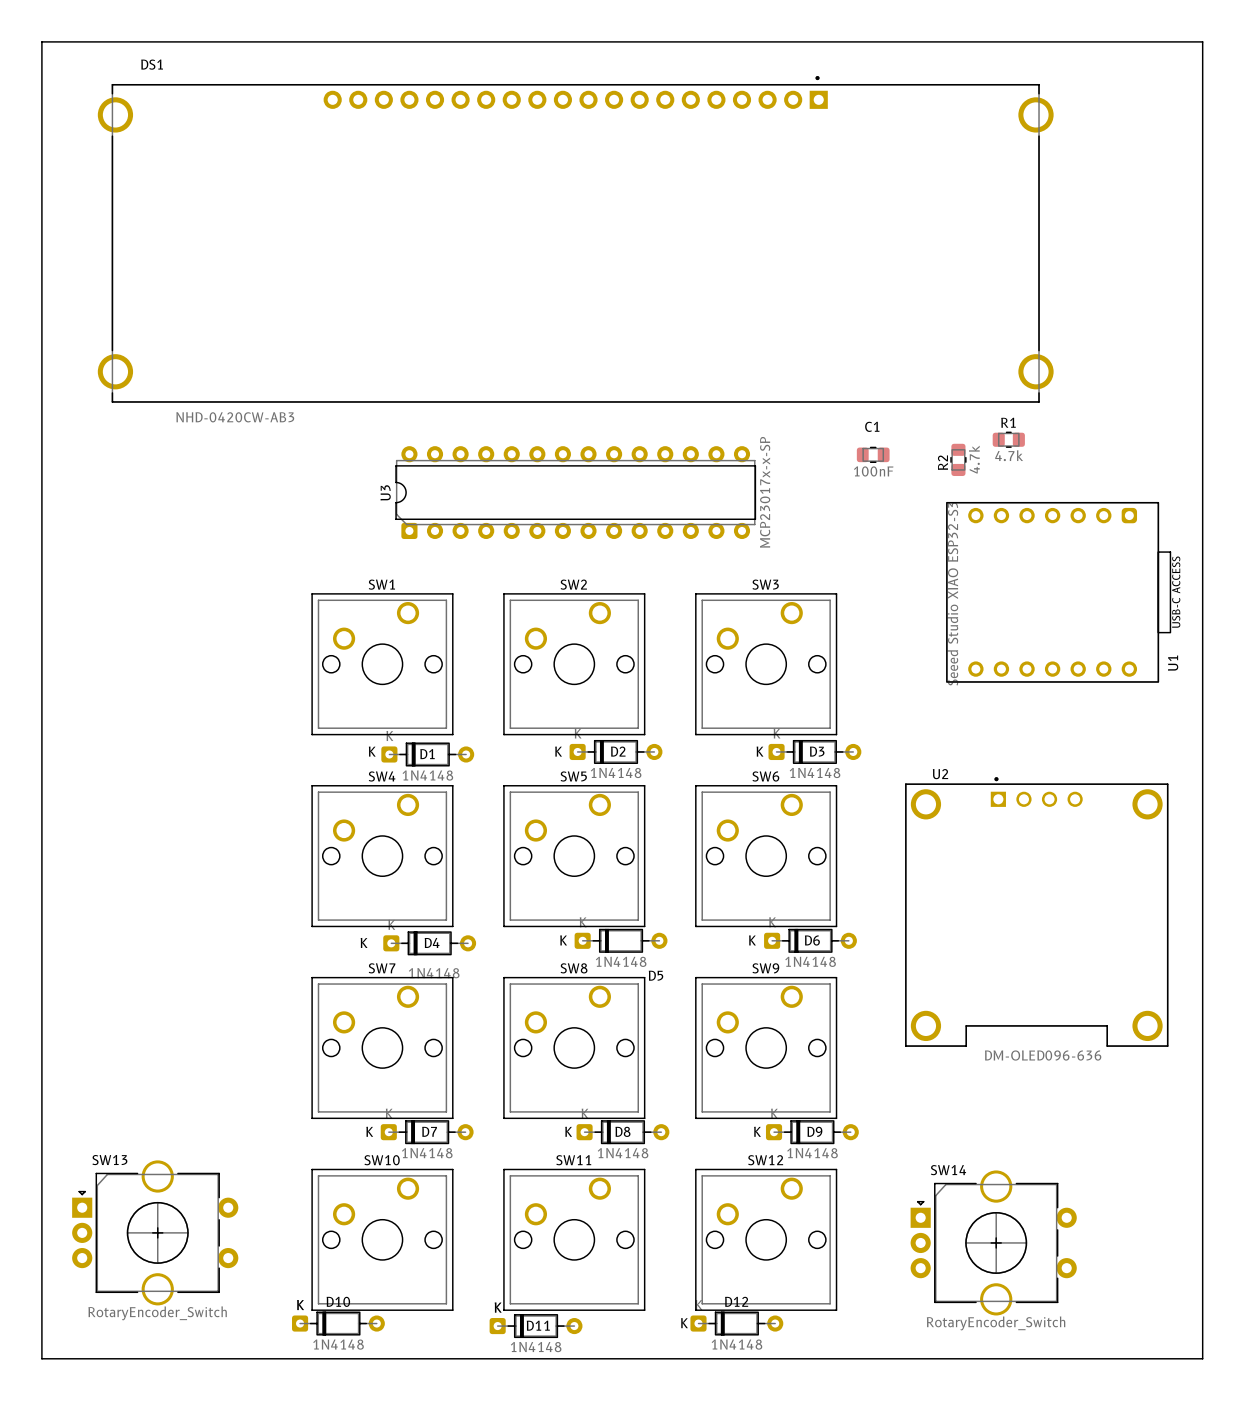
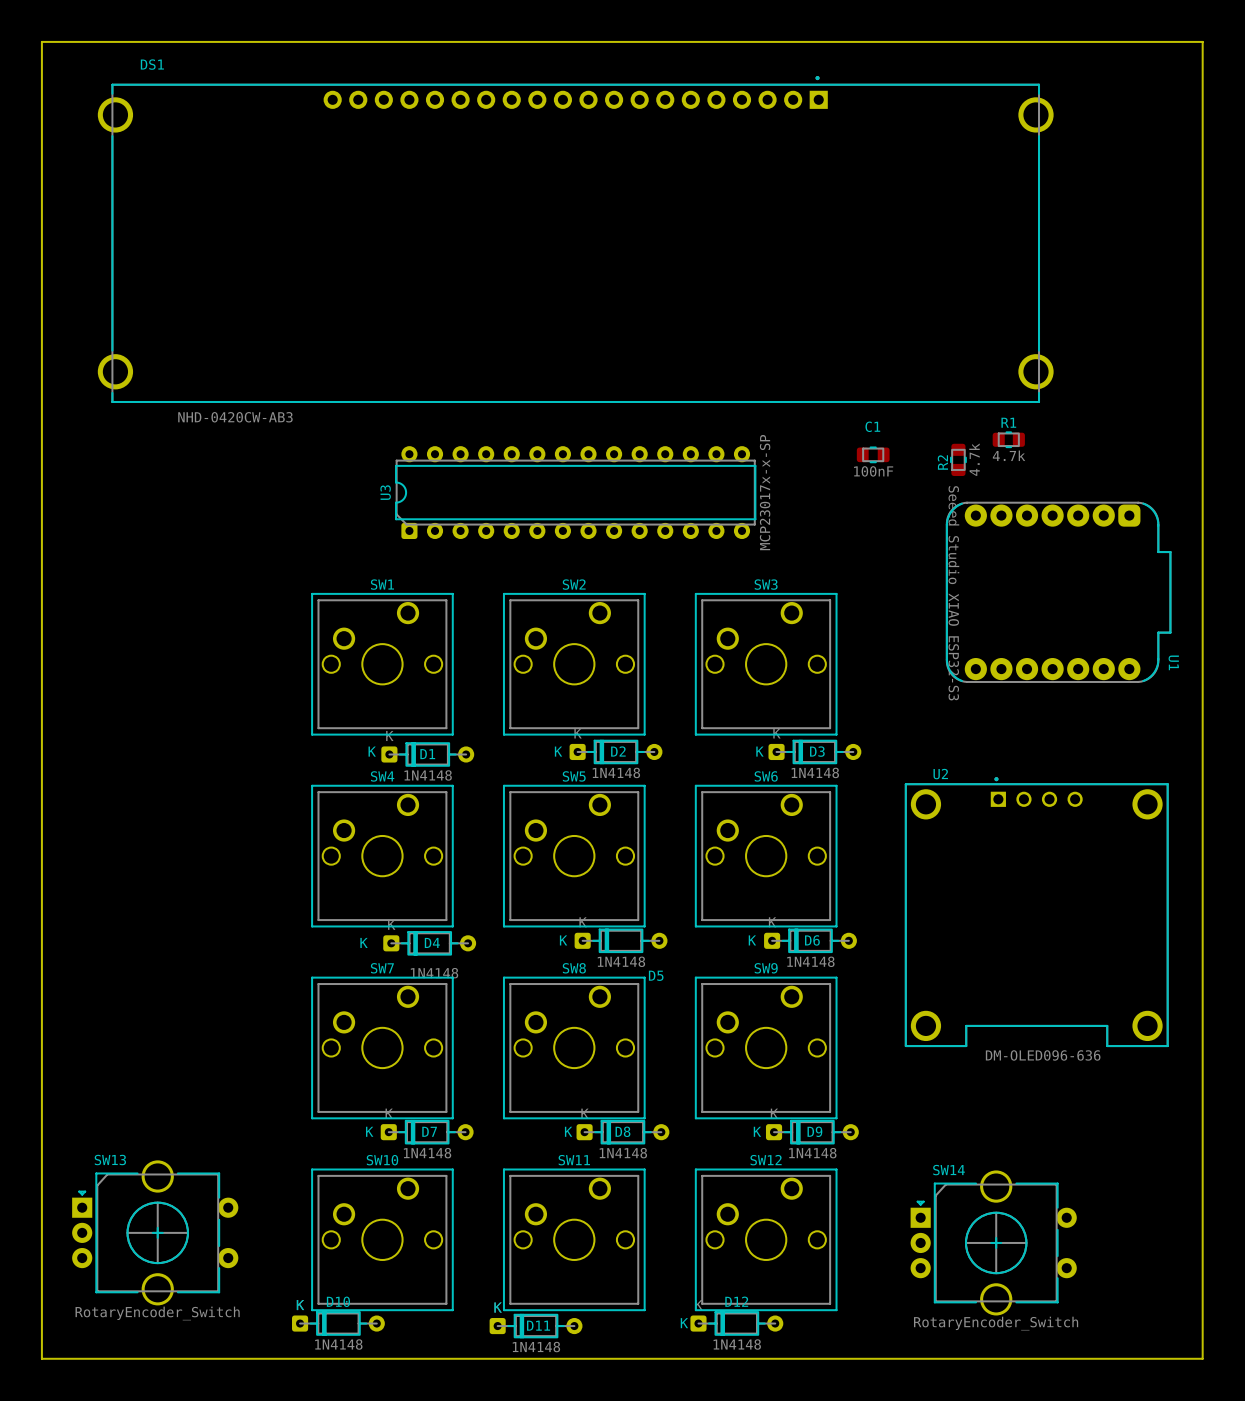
U1 footprint: [946, 502, 1172, 683] -> [946, 502, 1172, 683]

